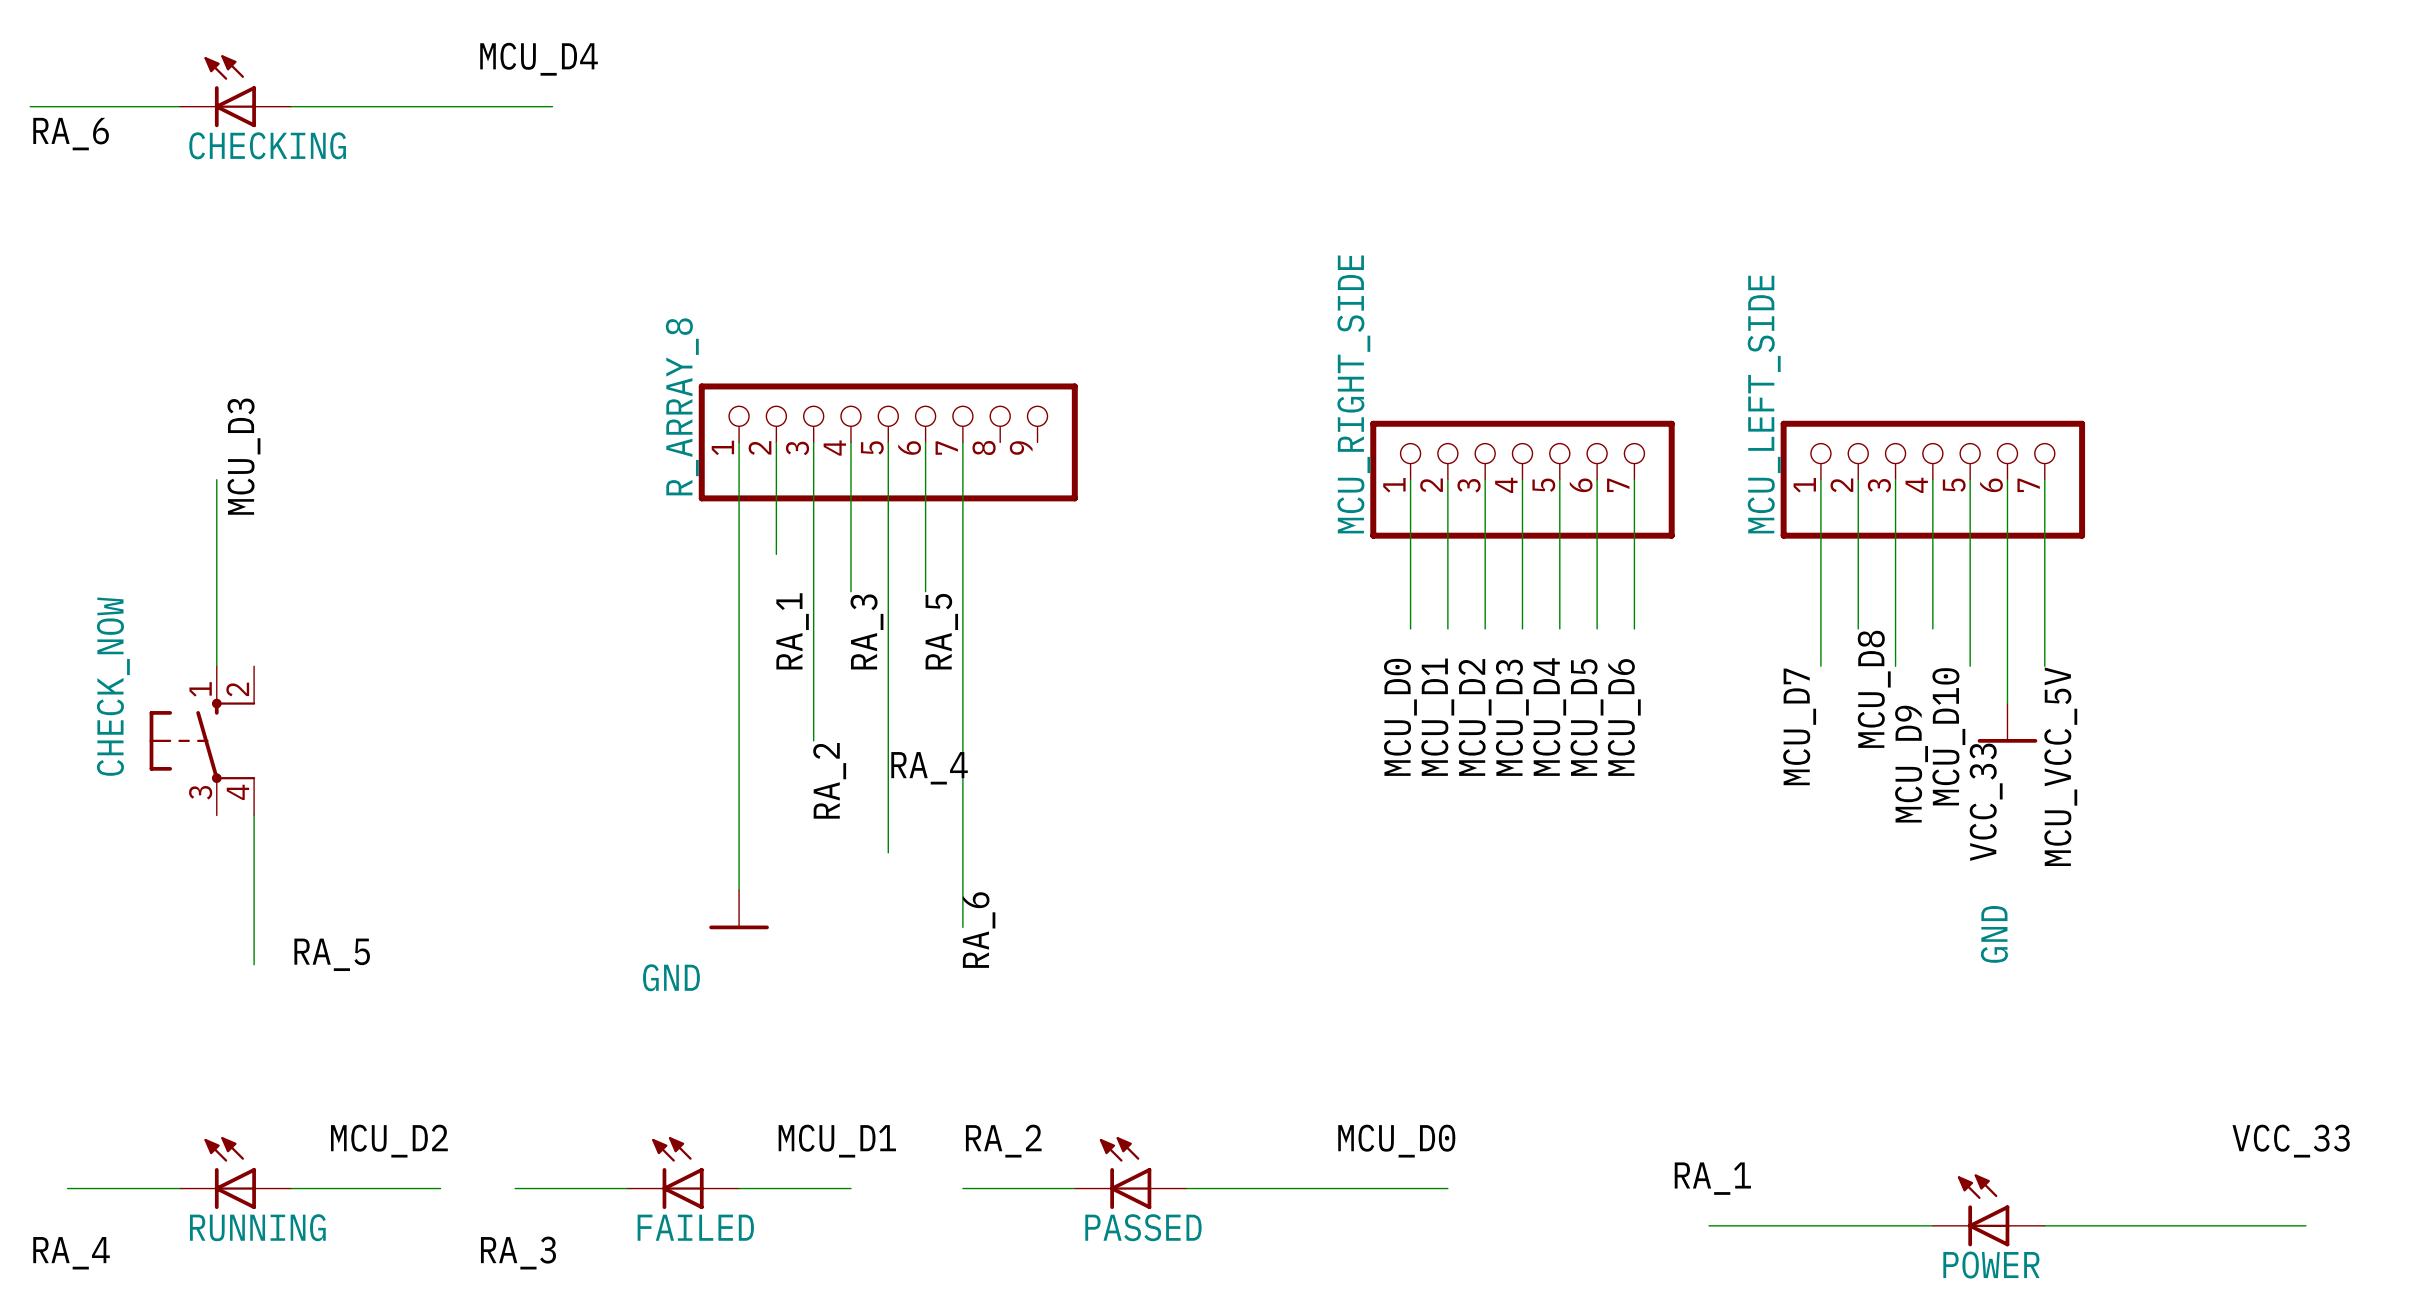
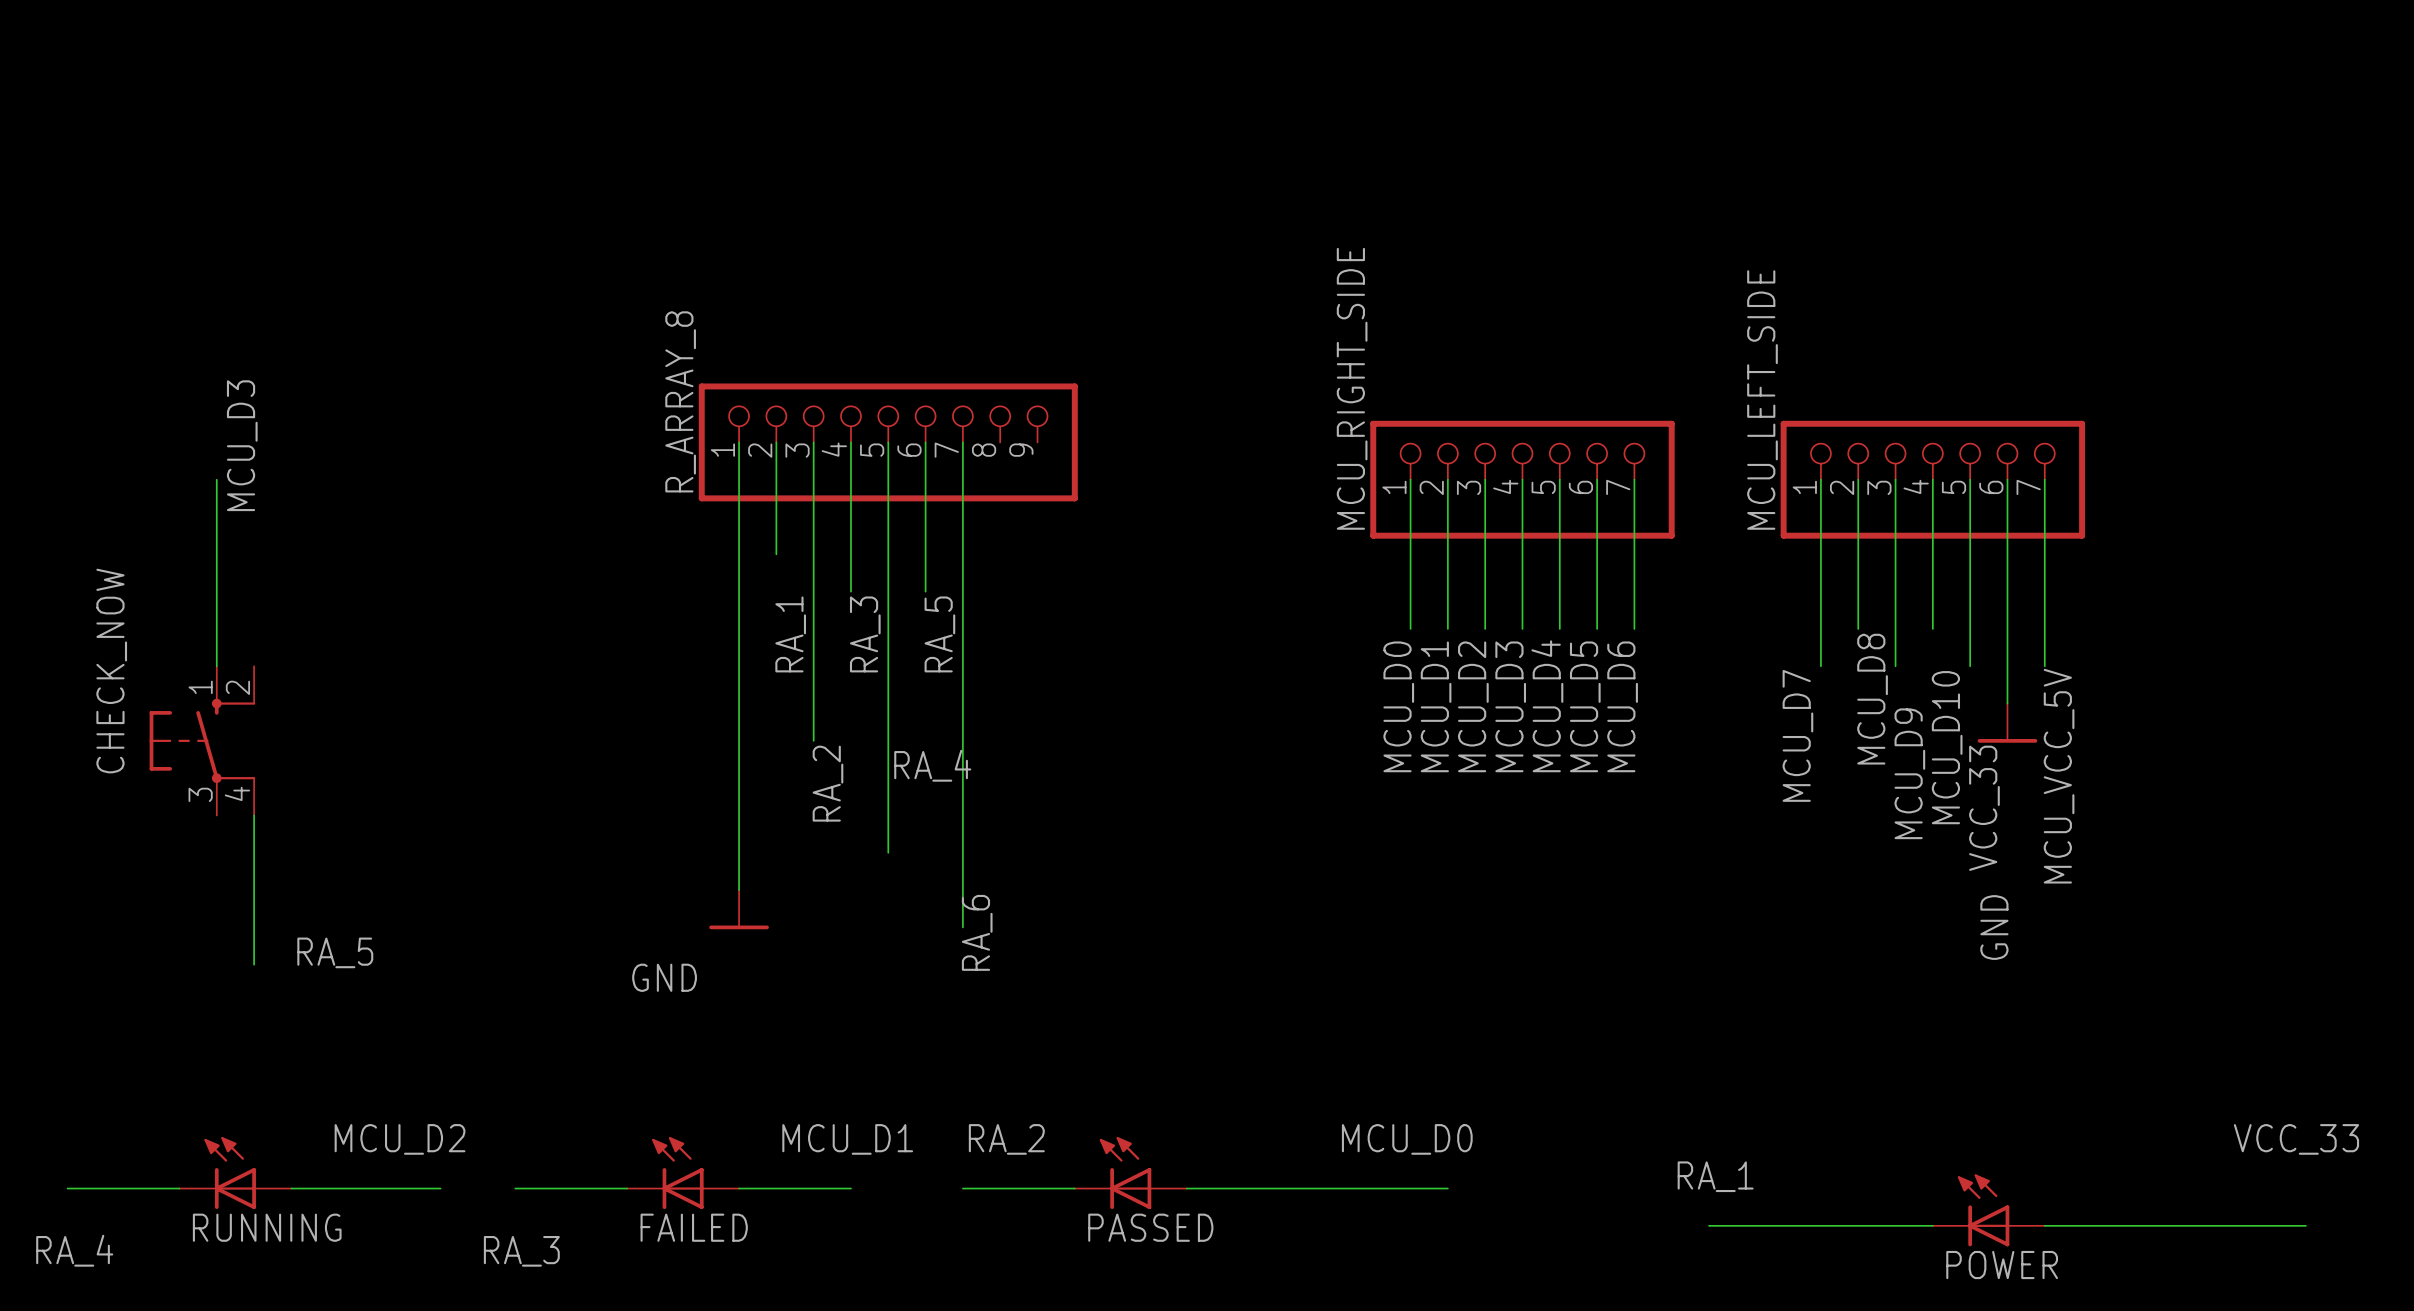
label: MCU_D4 (539, 59) -> none
CHECKING: (235, 91) -> none
wire: (30, 106) (179, 106) -> none
wire: (291, 106) (552, 106) -> none
label: RA_6 (71, 134) -> none

